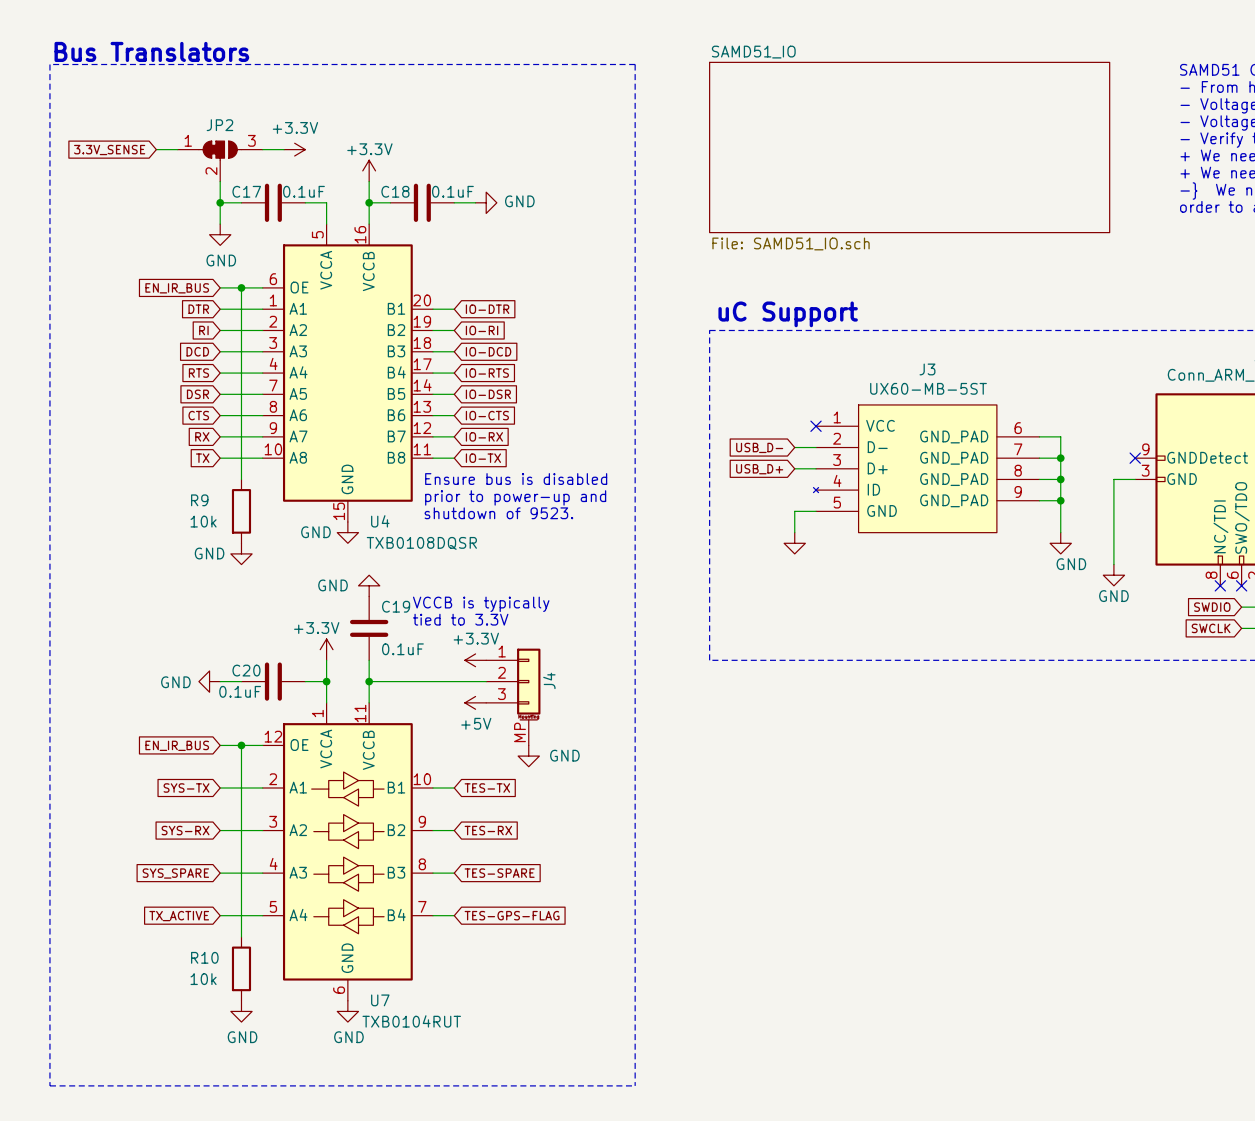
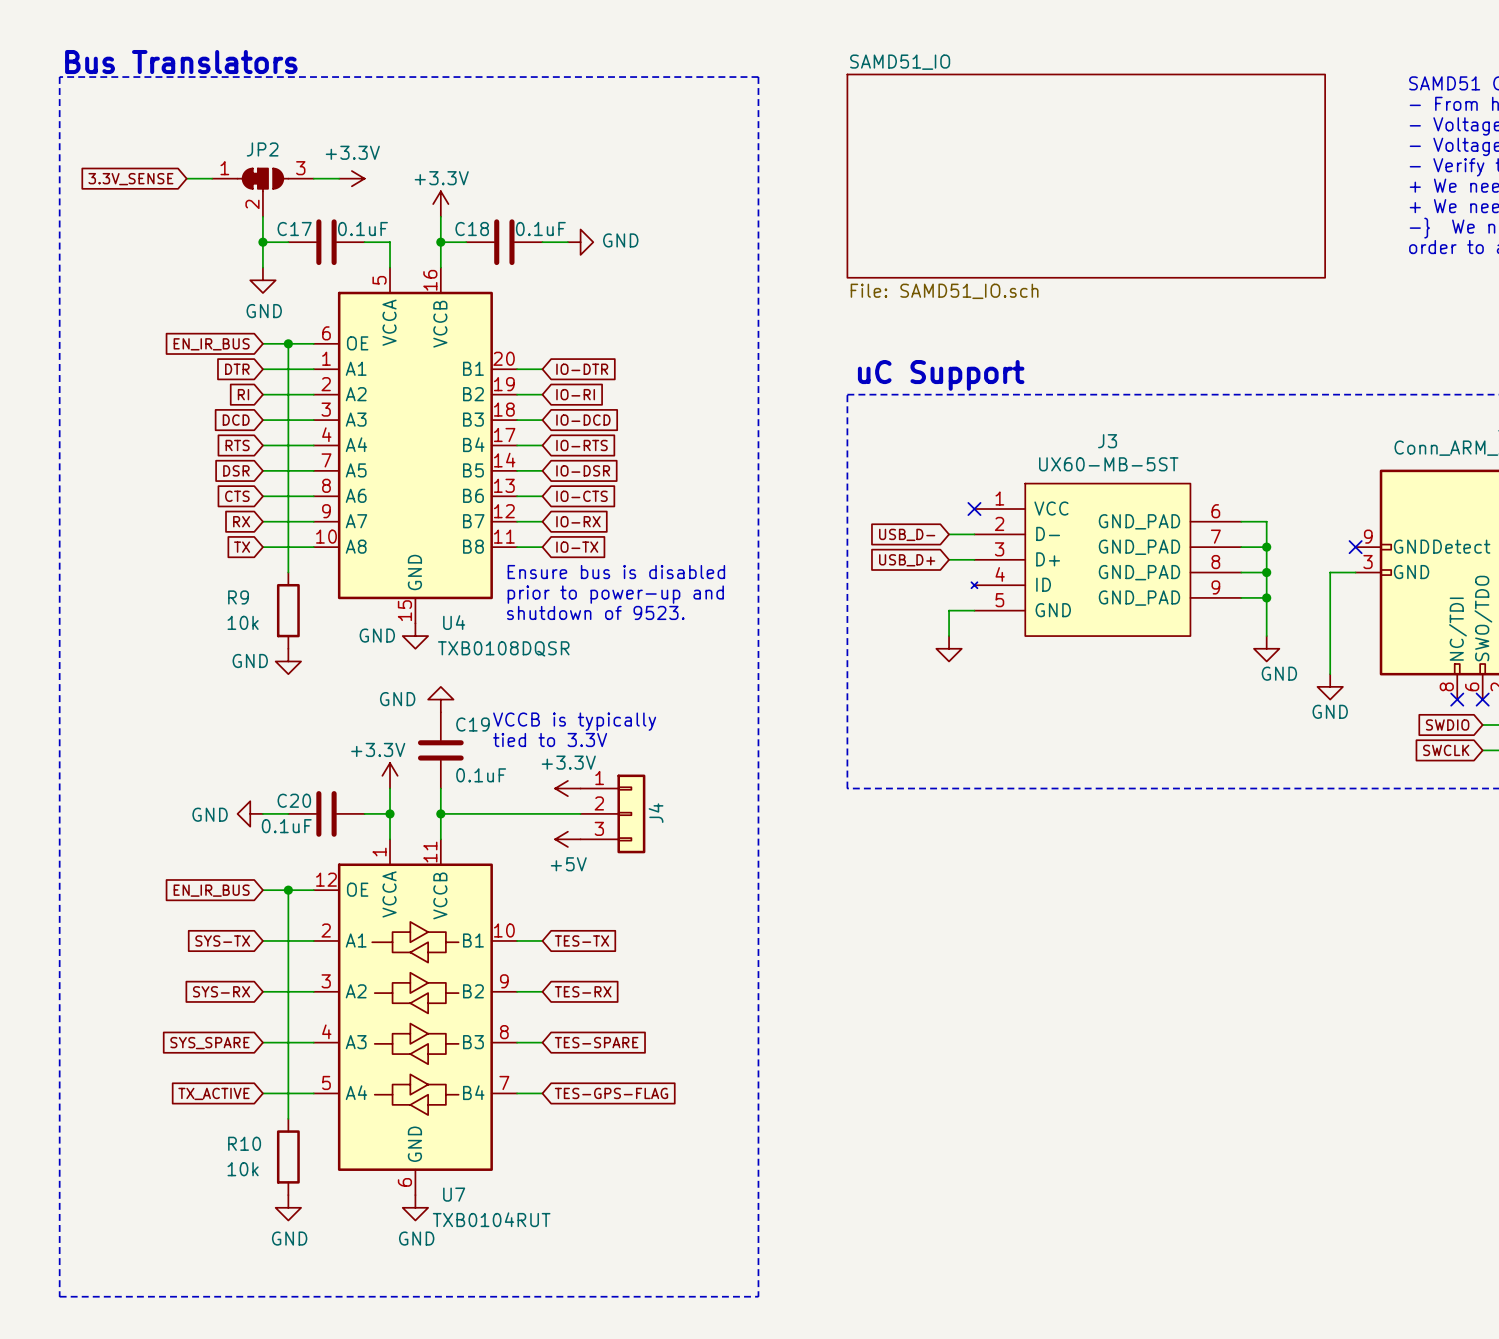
J4 symbol: [486, 648, 541, 746] -> [580, 774, 646, 854]
power symbol: GND (528, 756) -> none

